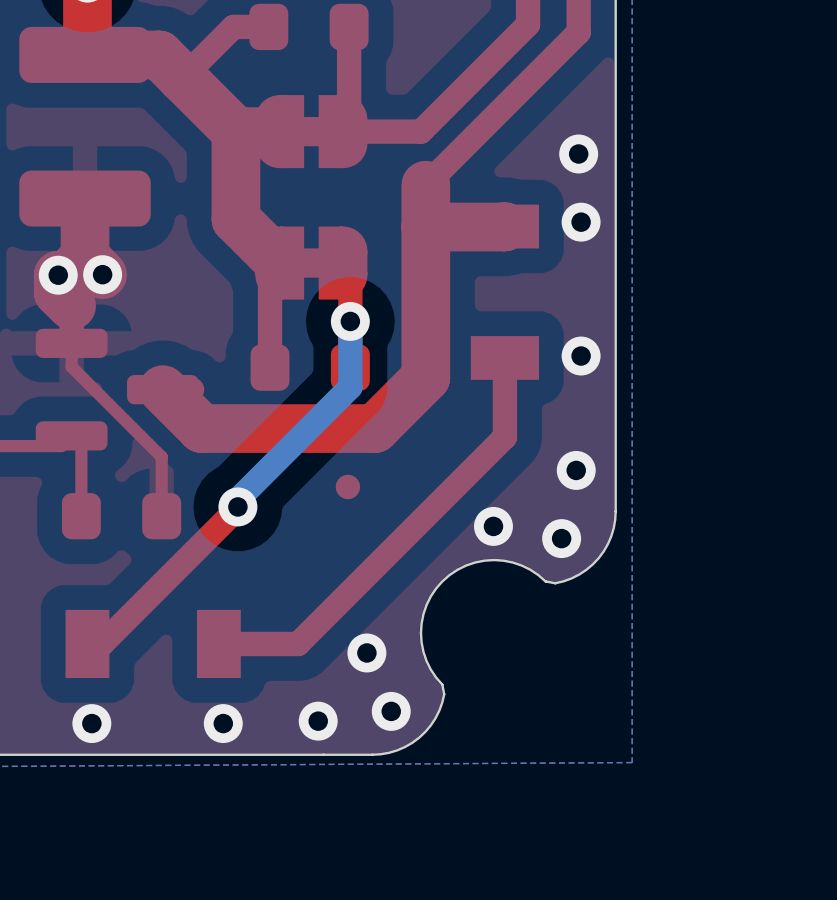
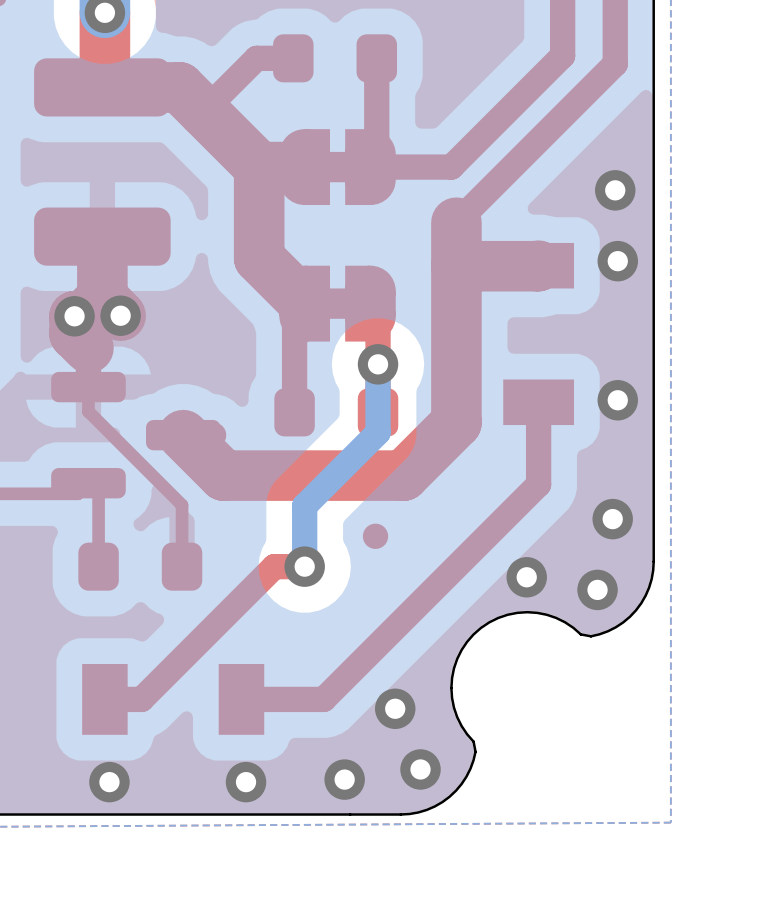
bottom track: (279, 457) (237, 499) (237, 506) -> (304, 505) (304, 566)
top track: (237, 506) (102, 643) -> (304, 566) (274, 566) (141, 699) (120, 699)
via position: (237, 506) -> (304, 566)

